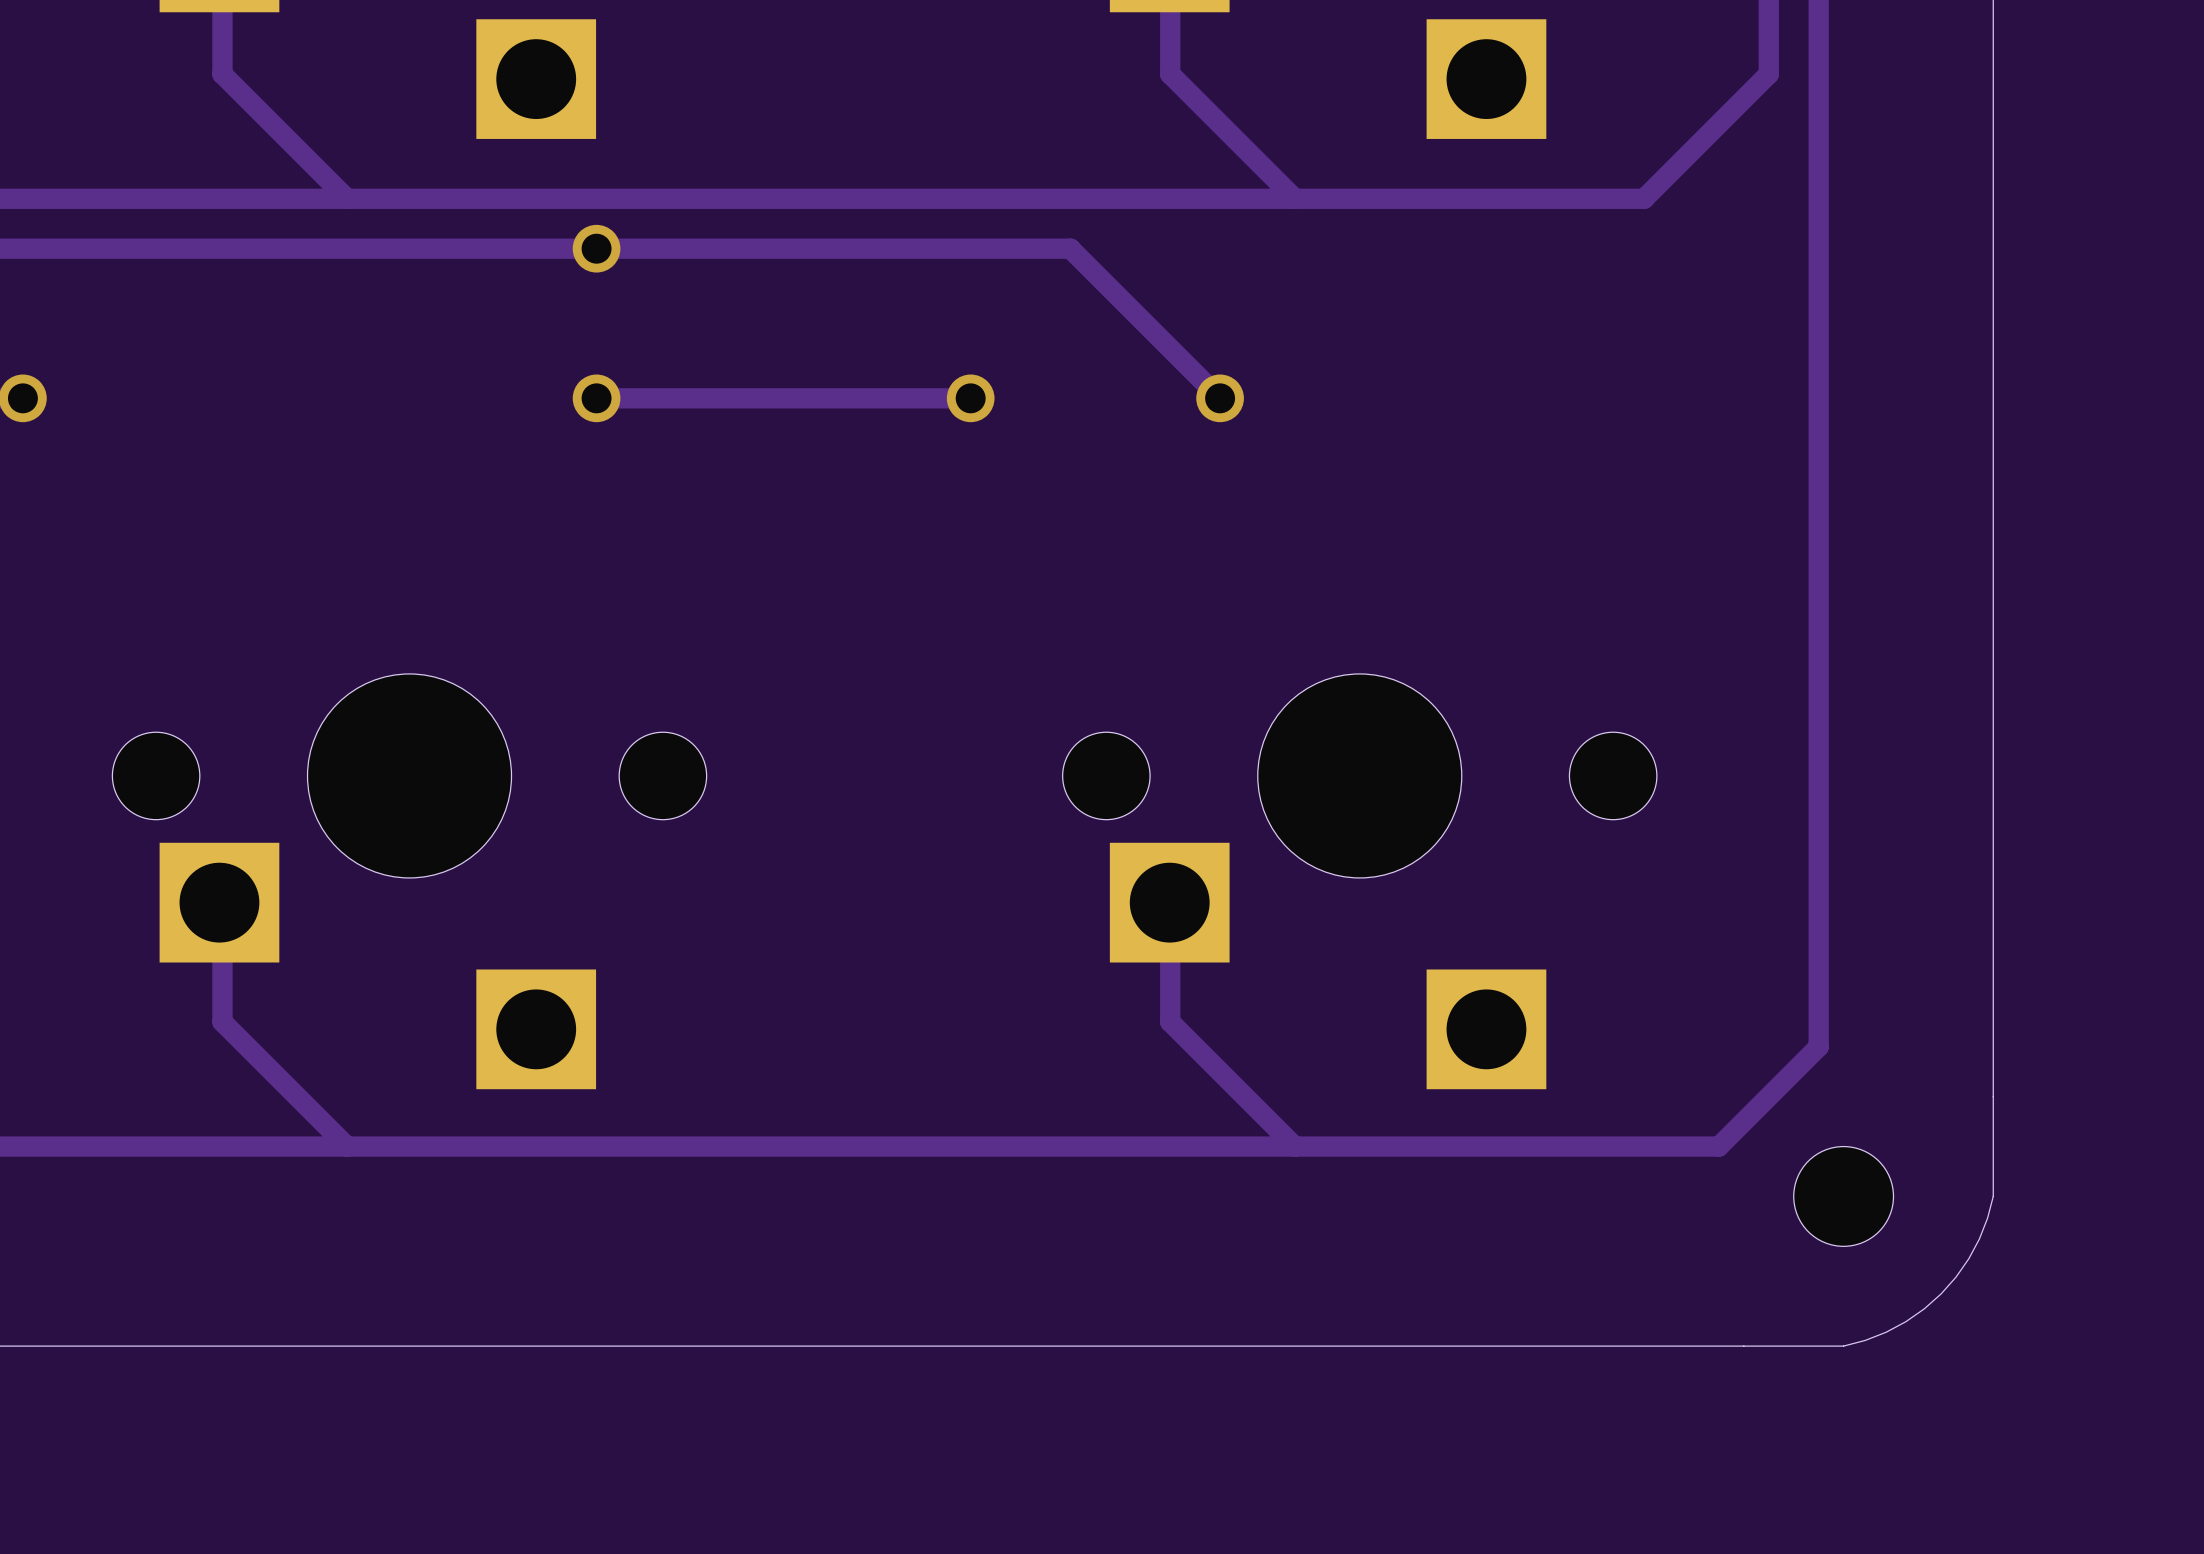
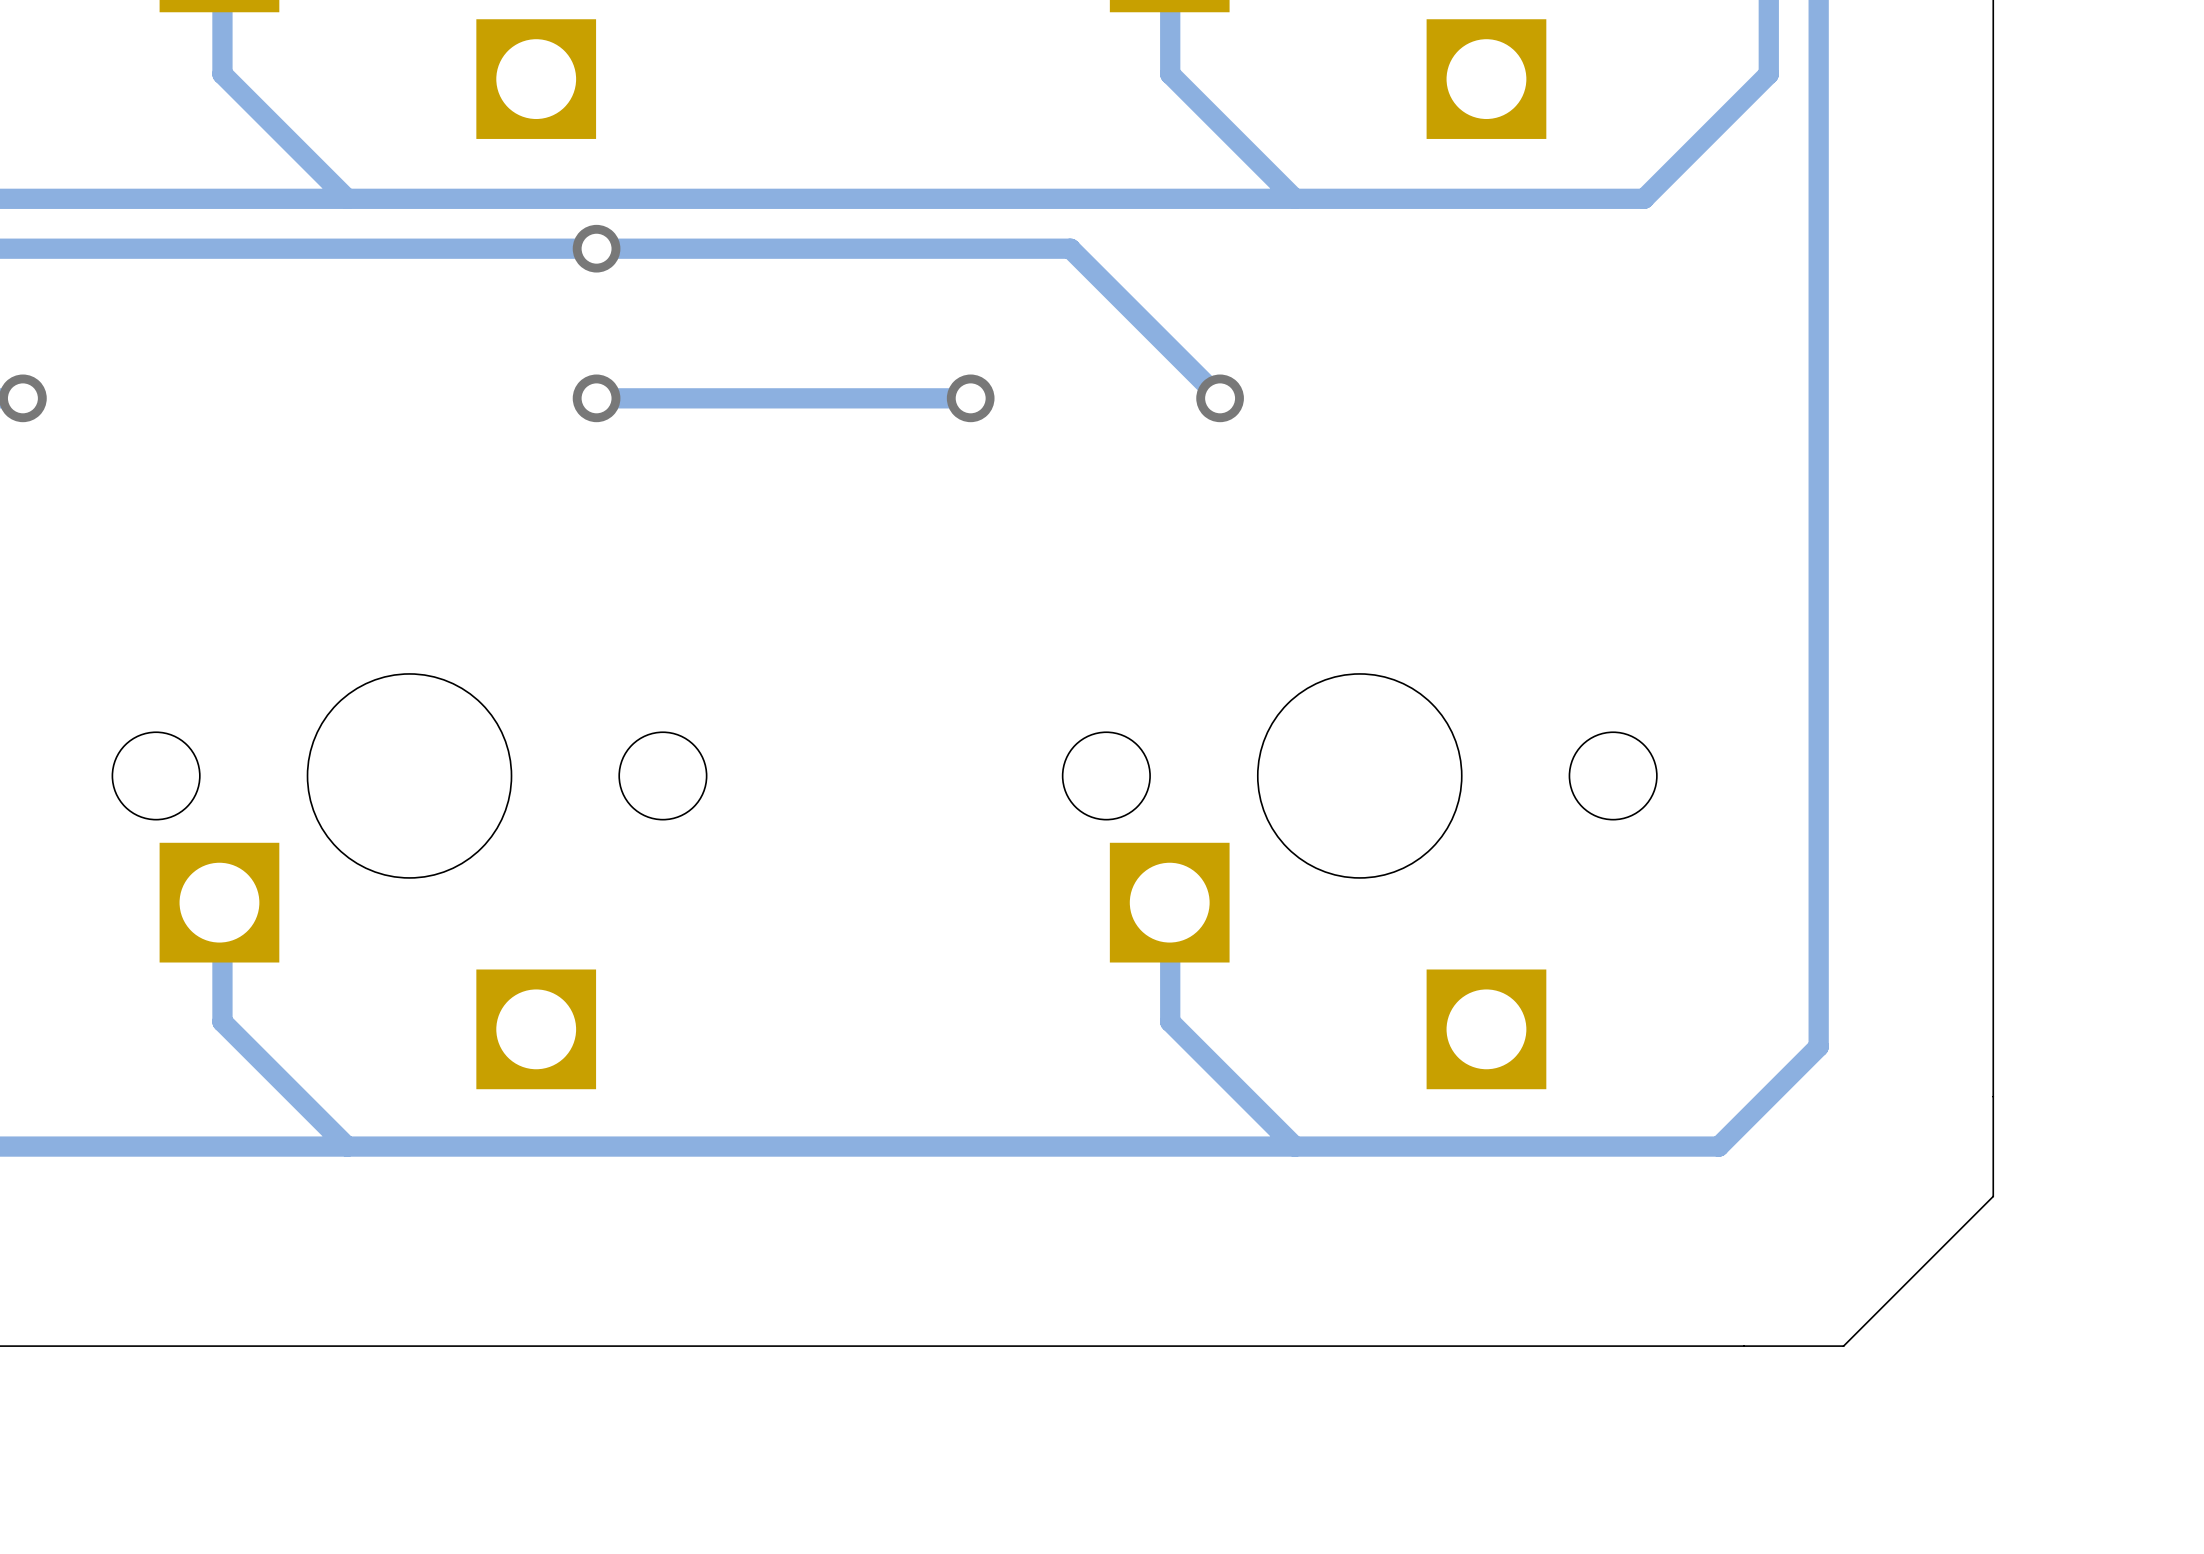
hole: (1843, 1196) -> none
board edge: (1993, 1196) (1979, 1239) (1955, 1277) (1941, 1293) (1924, 1308) (1886, 1332) (1843, 1346) -> (1993, 1196) (1843, 1346)

